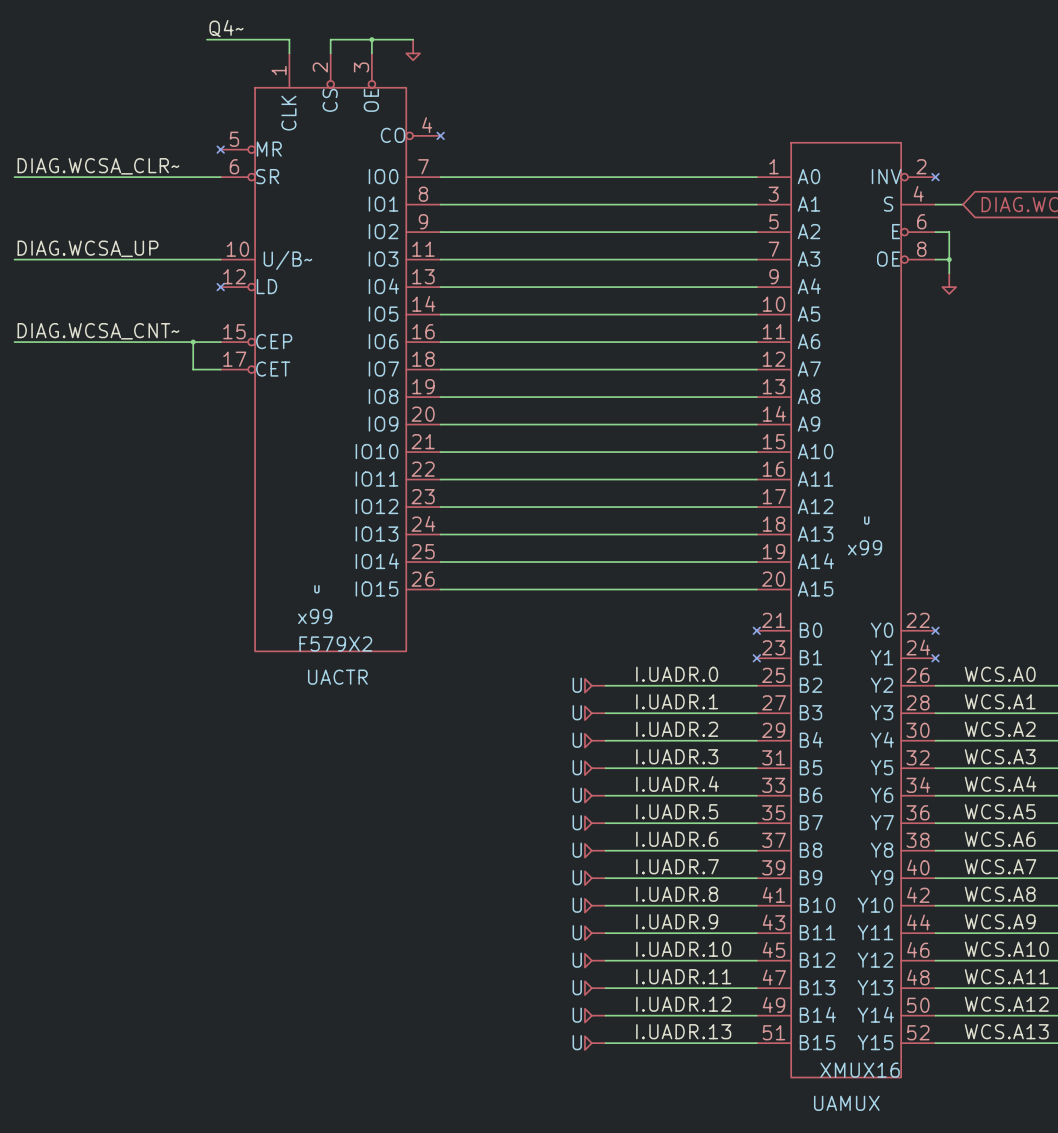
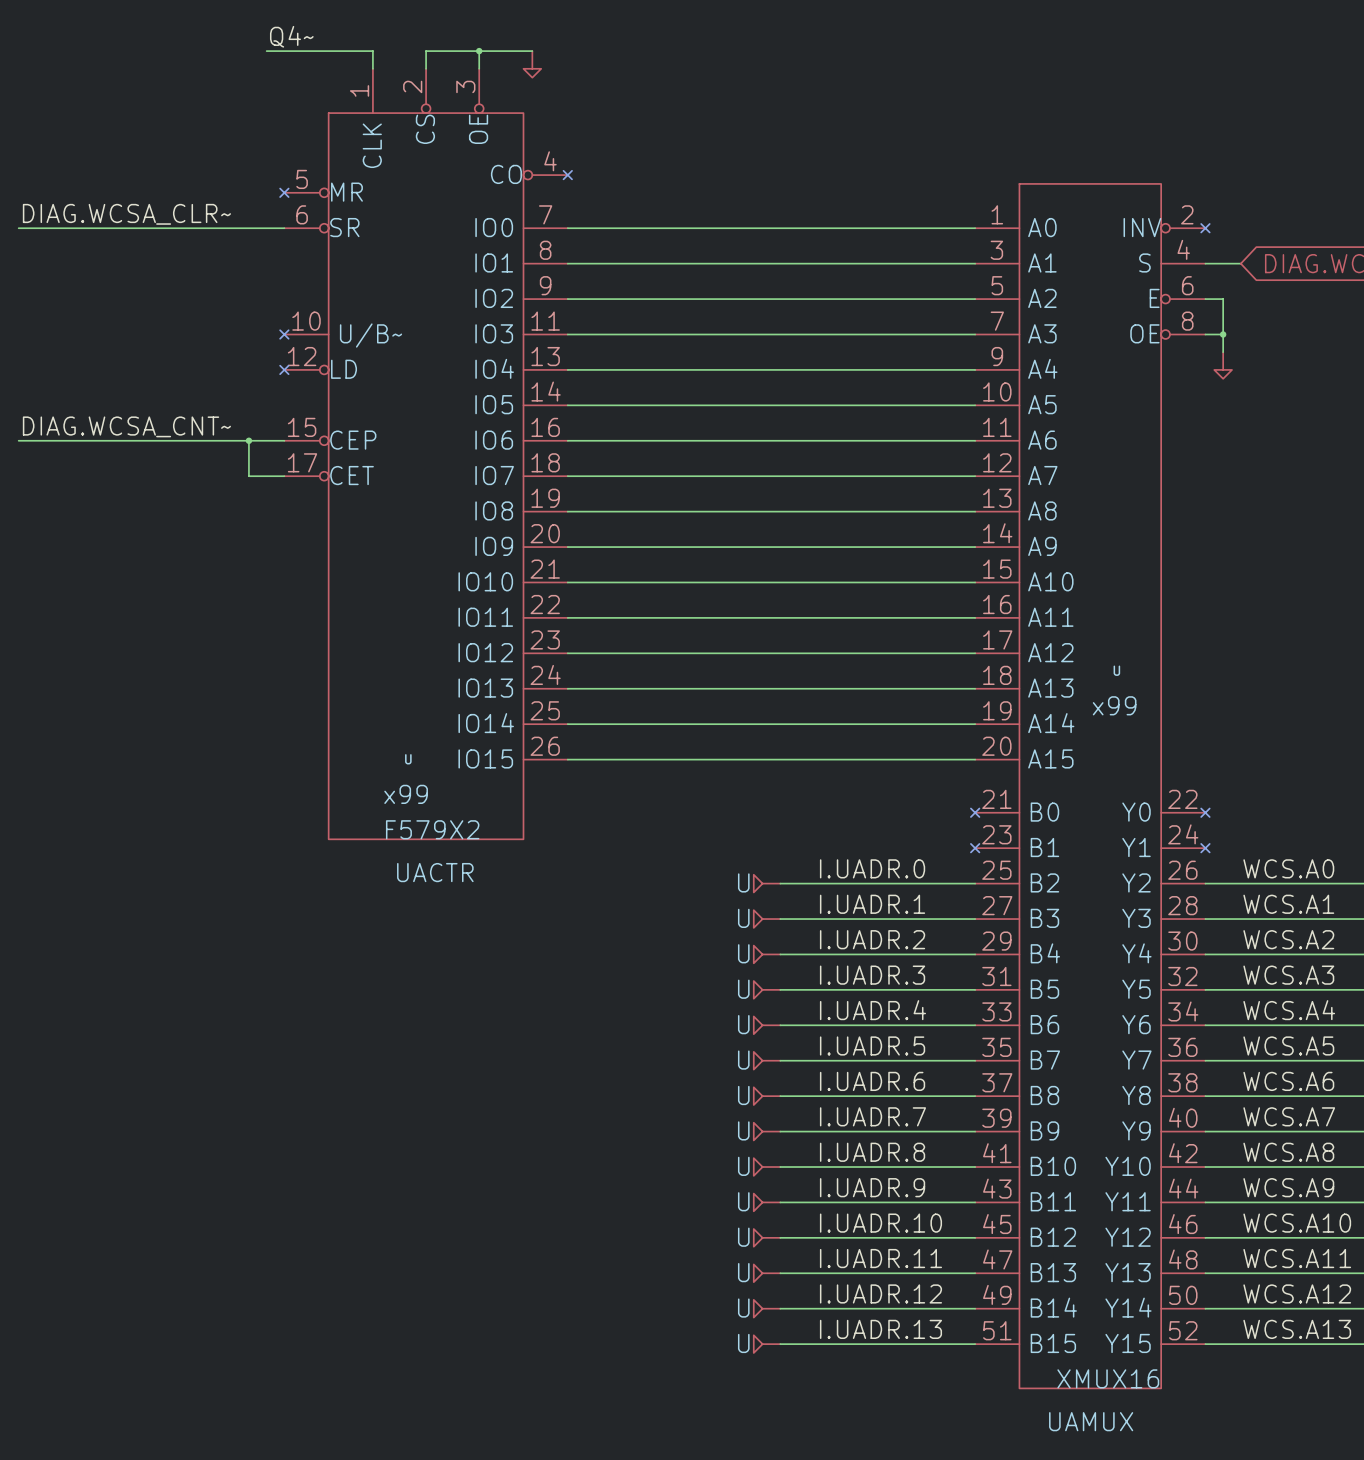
label: DIAG.WCSA_UP (88, 248) -> none
wire: (14, 259) (220, 259) -> none
no-connect mark: none -> (284, 334)

